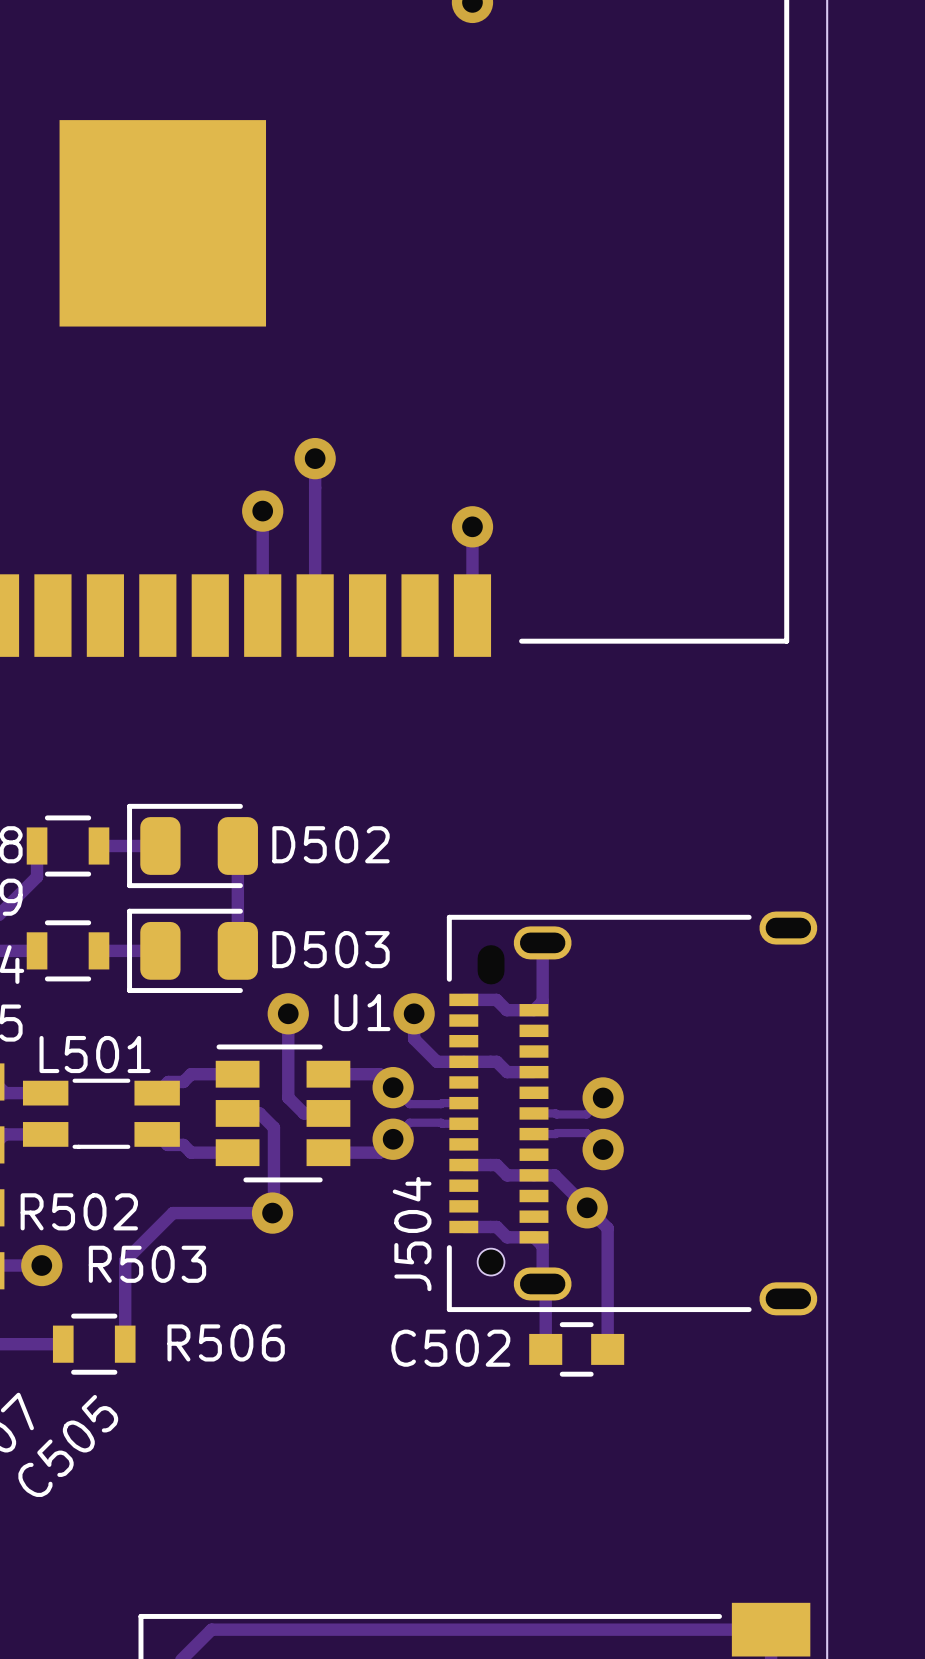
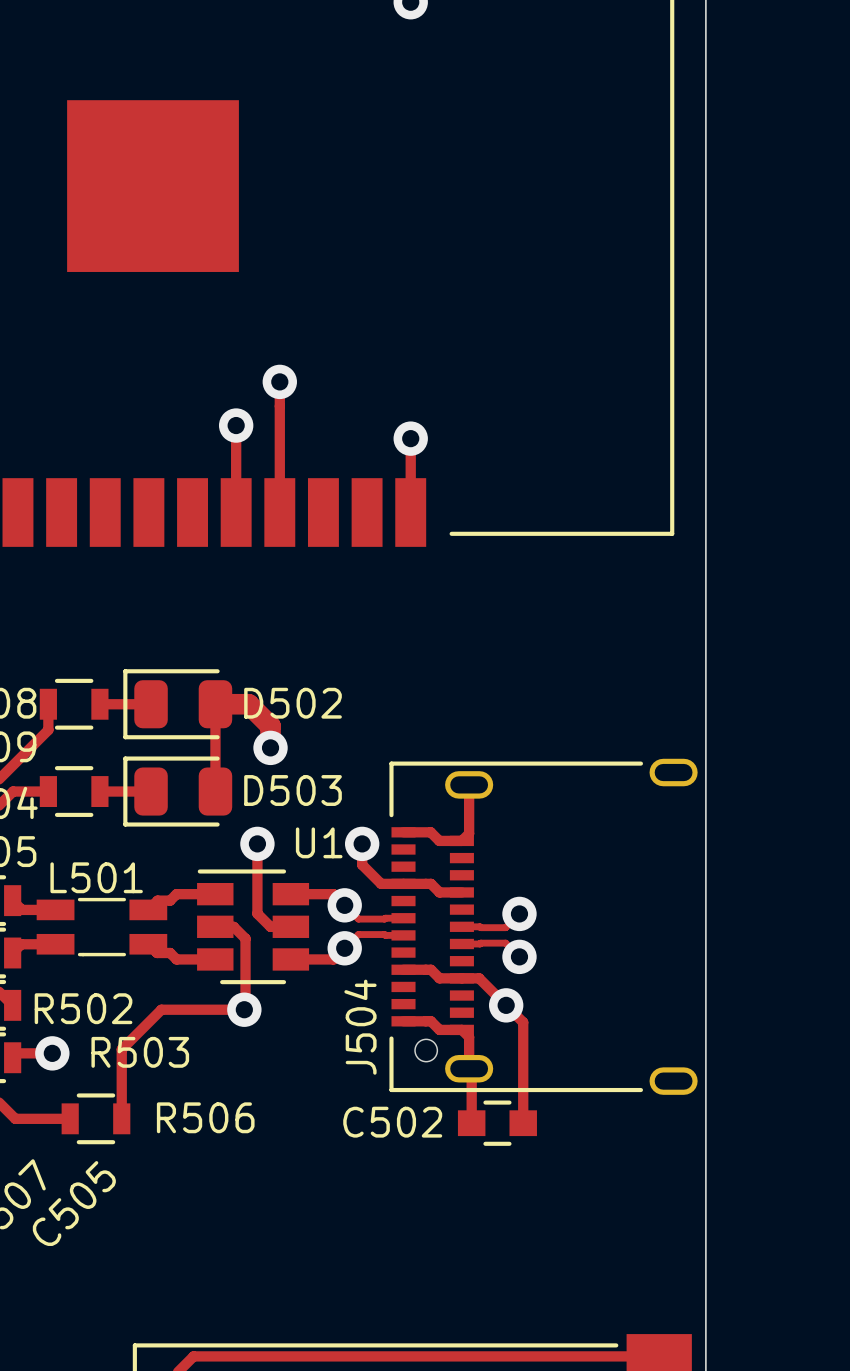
track: none -> (215, 704) (248, 704) (270, 726) (270, 747)
via: none -> (270, 747)

